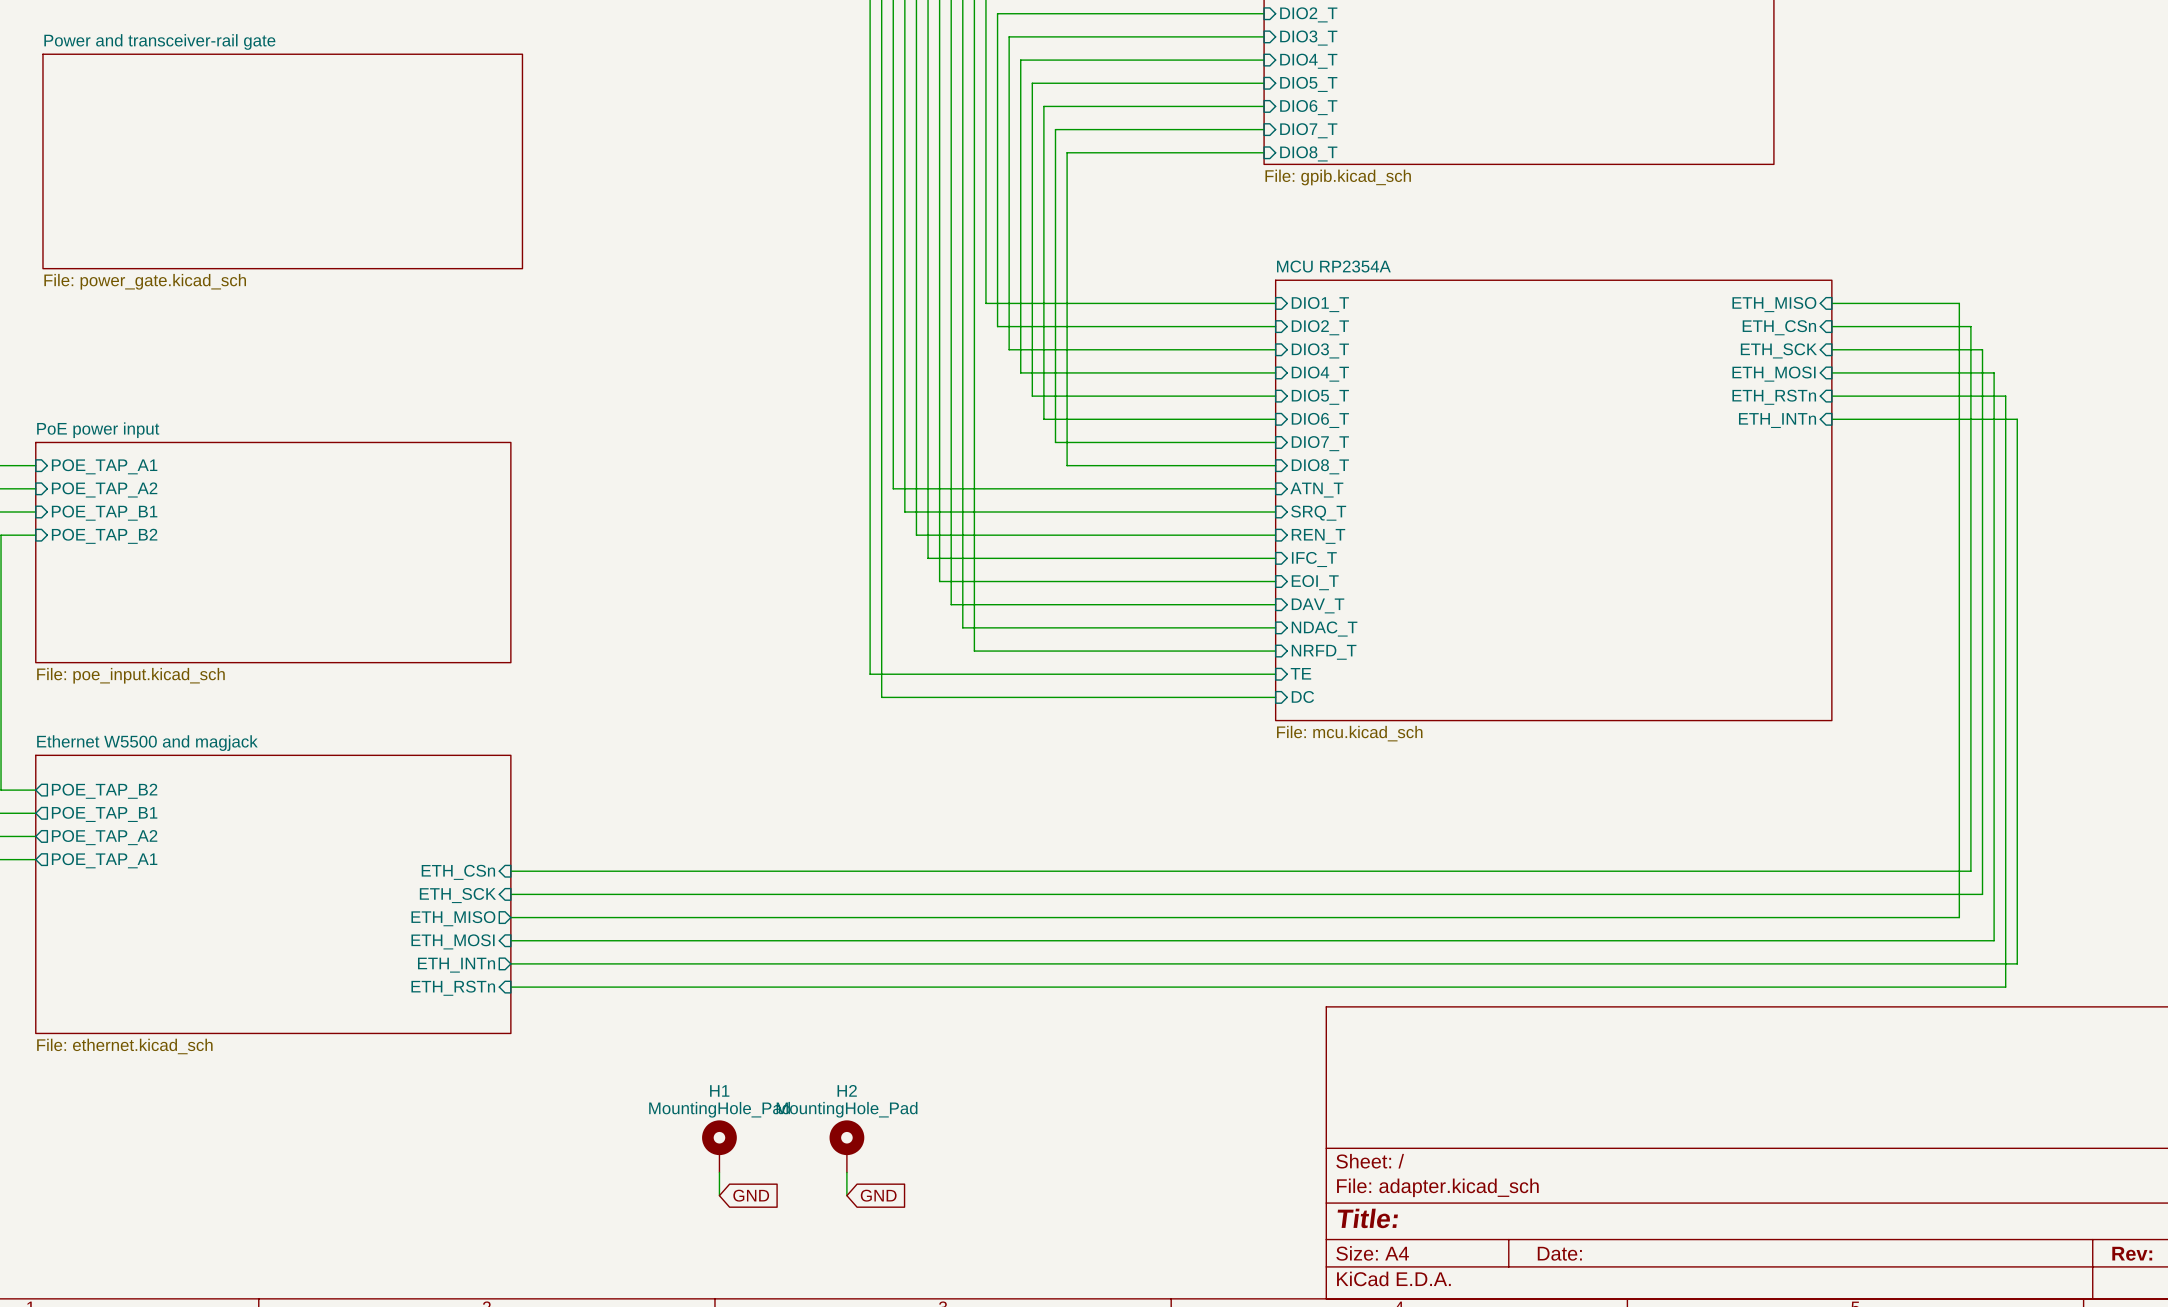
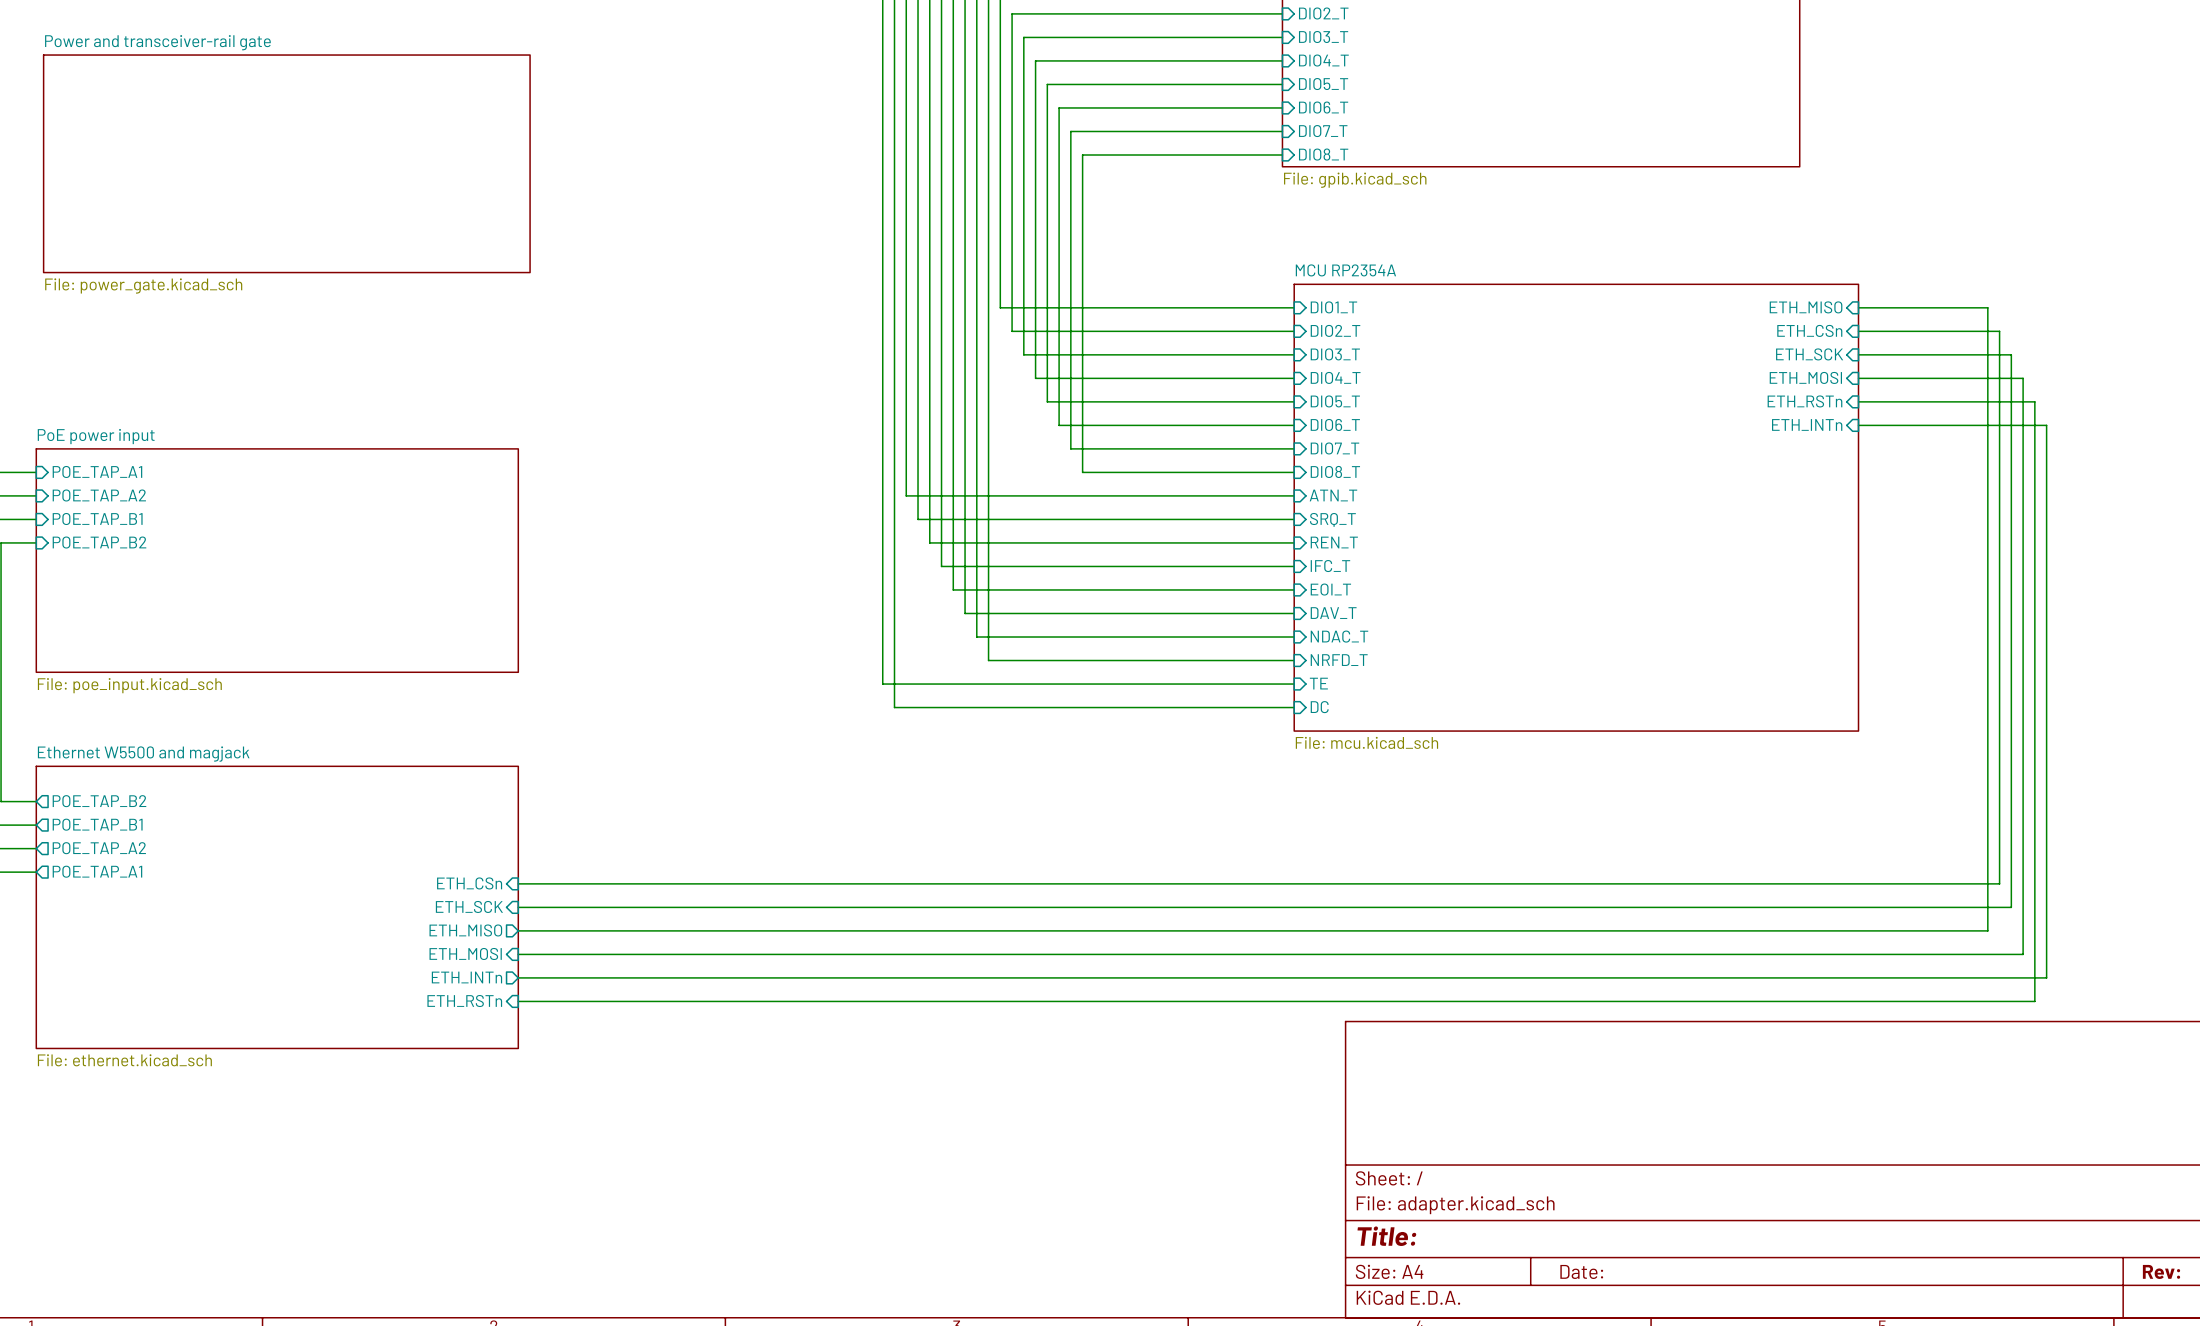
H1: MountingHole_Pad (719, 1146) -> none
H2: MountingHole_Pad (846, 1146) -> none
wire: (719, 1172) (719, 1195) -> none
wire: (846, 1172) (846, 1195) -> none
global label: GND (751, 1195) -> none
global label: GND (878, 1195) -> none

